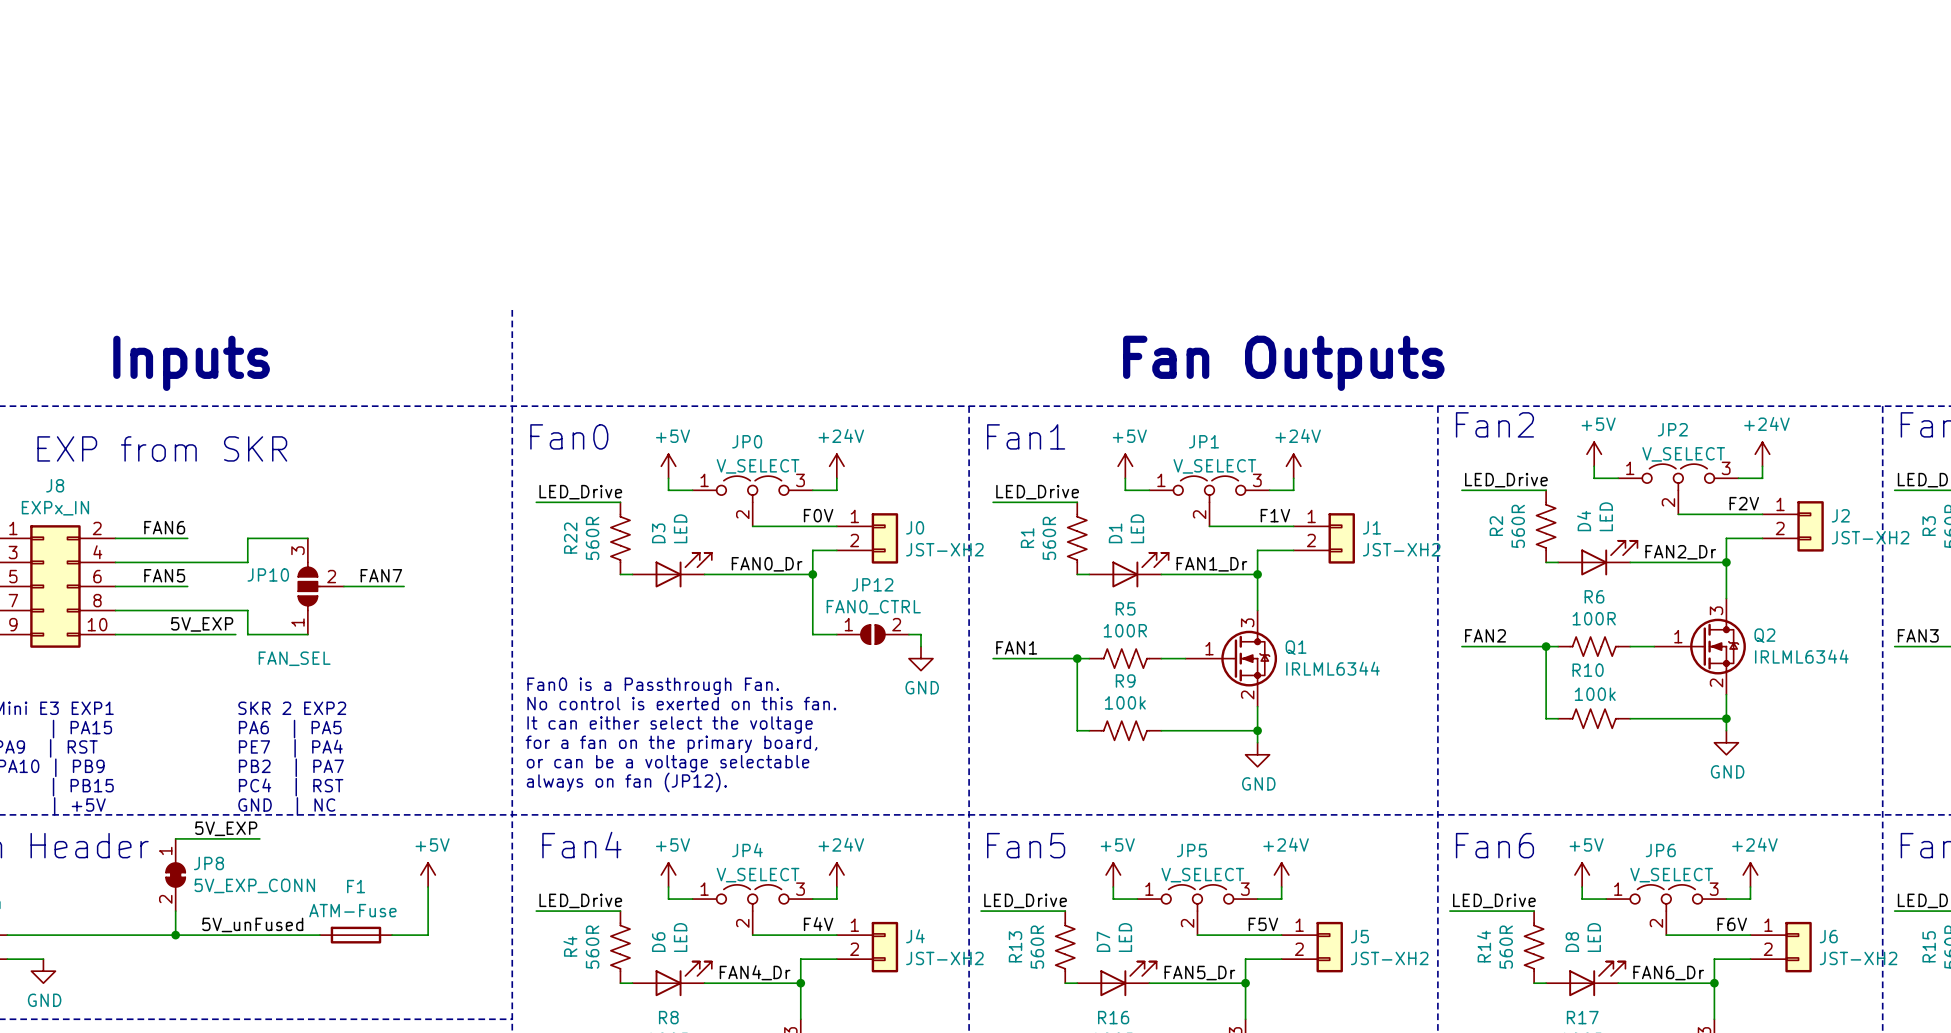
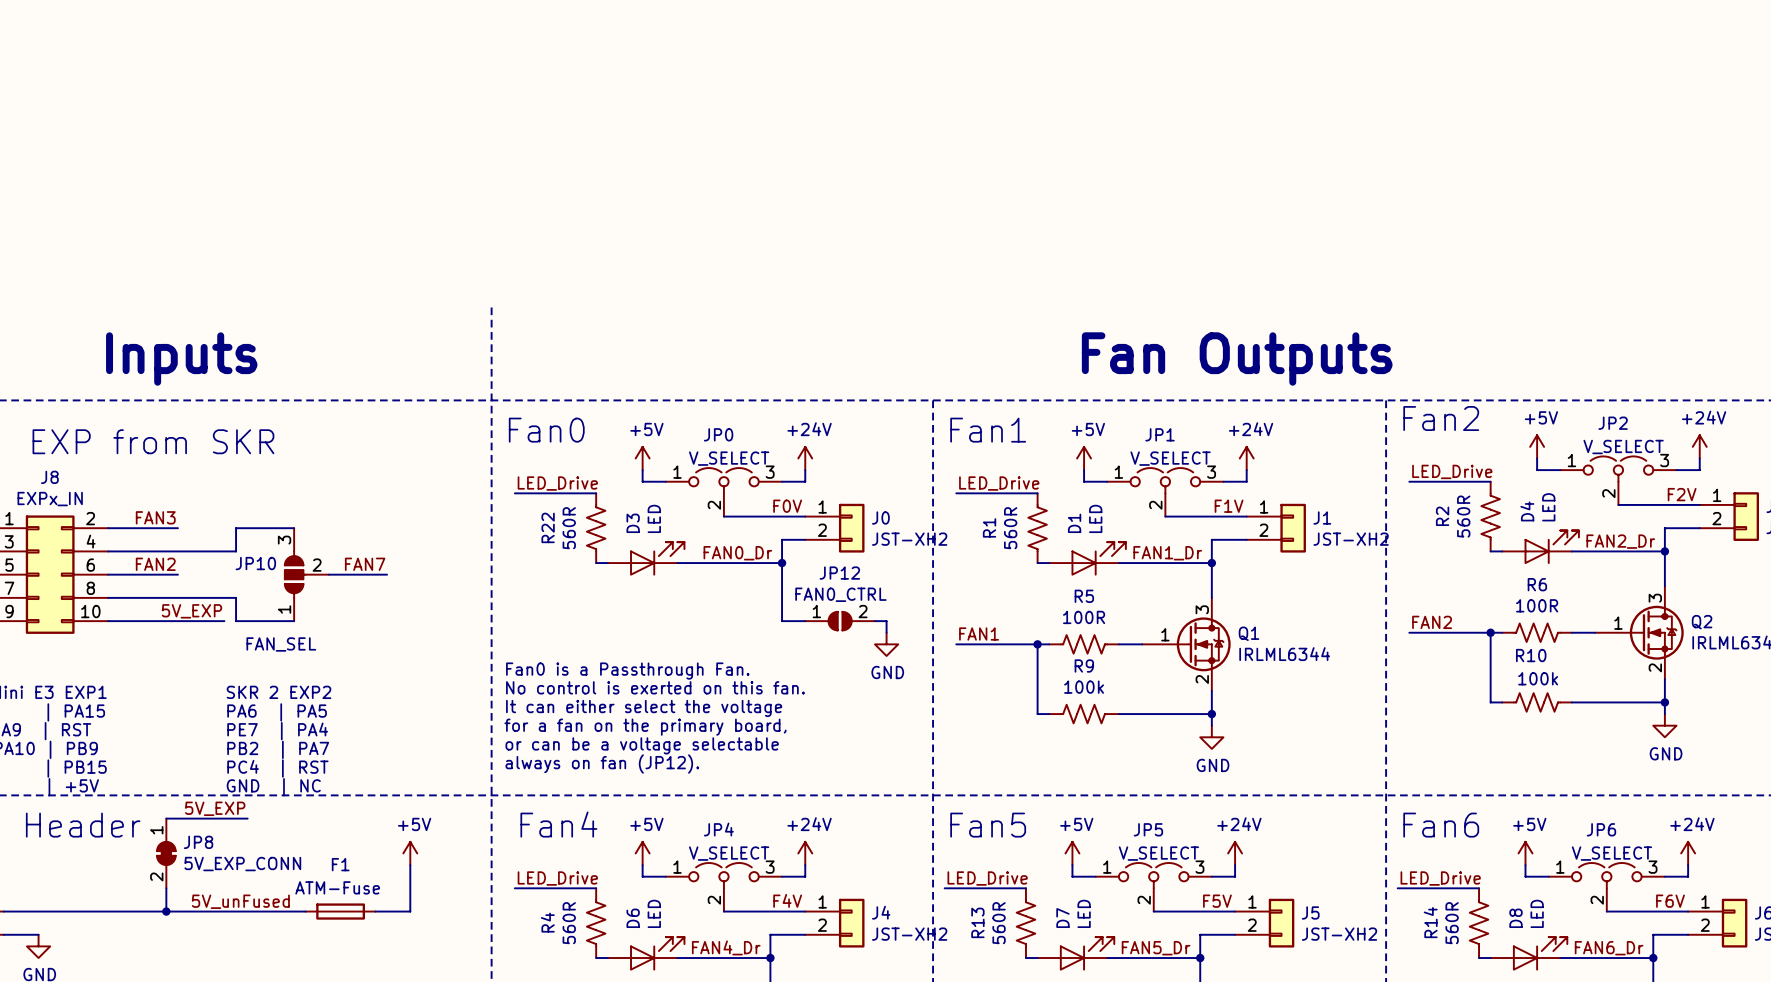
label: FAN6 (164, 527) -> FAN3 (155, 517)
label: FAN5 (164, 575) -> FAN2 (155, 564)

